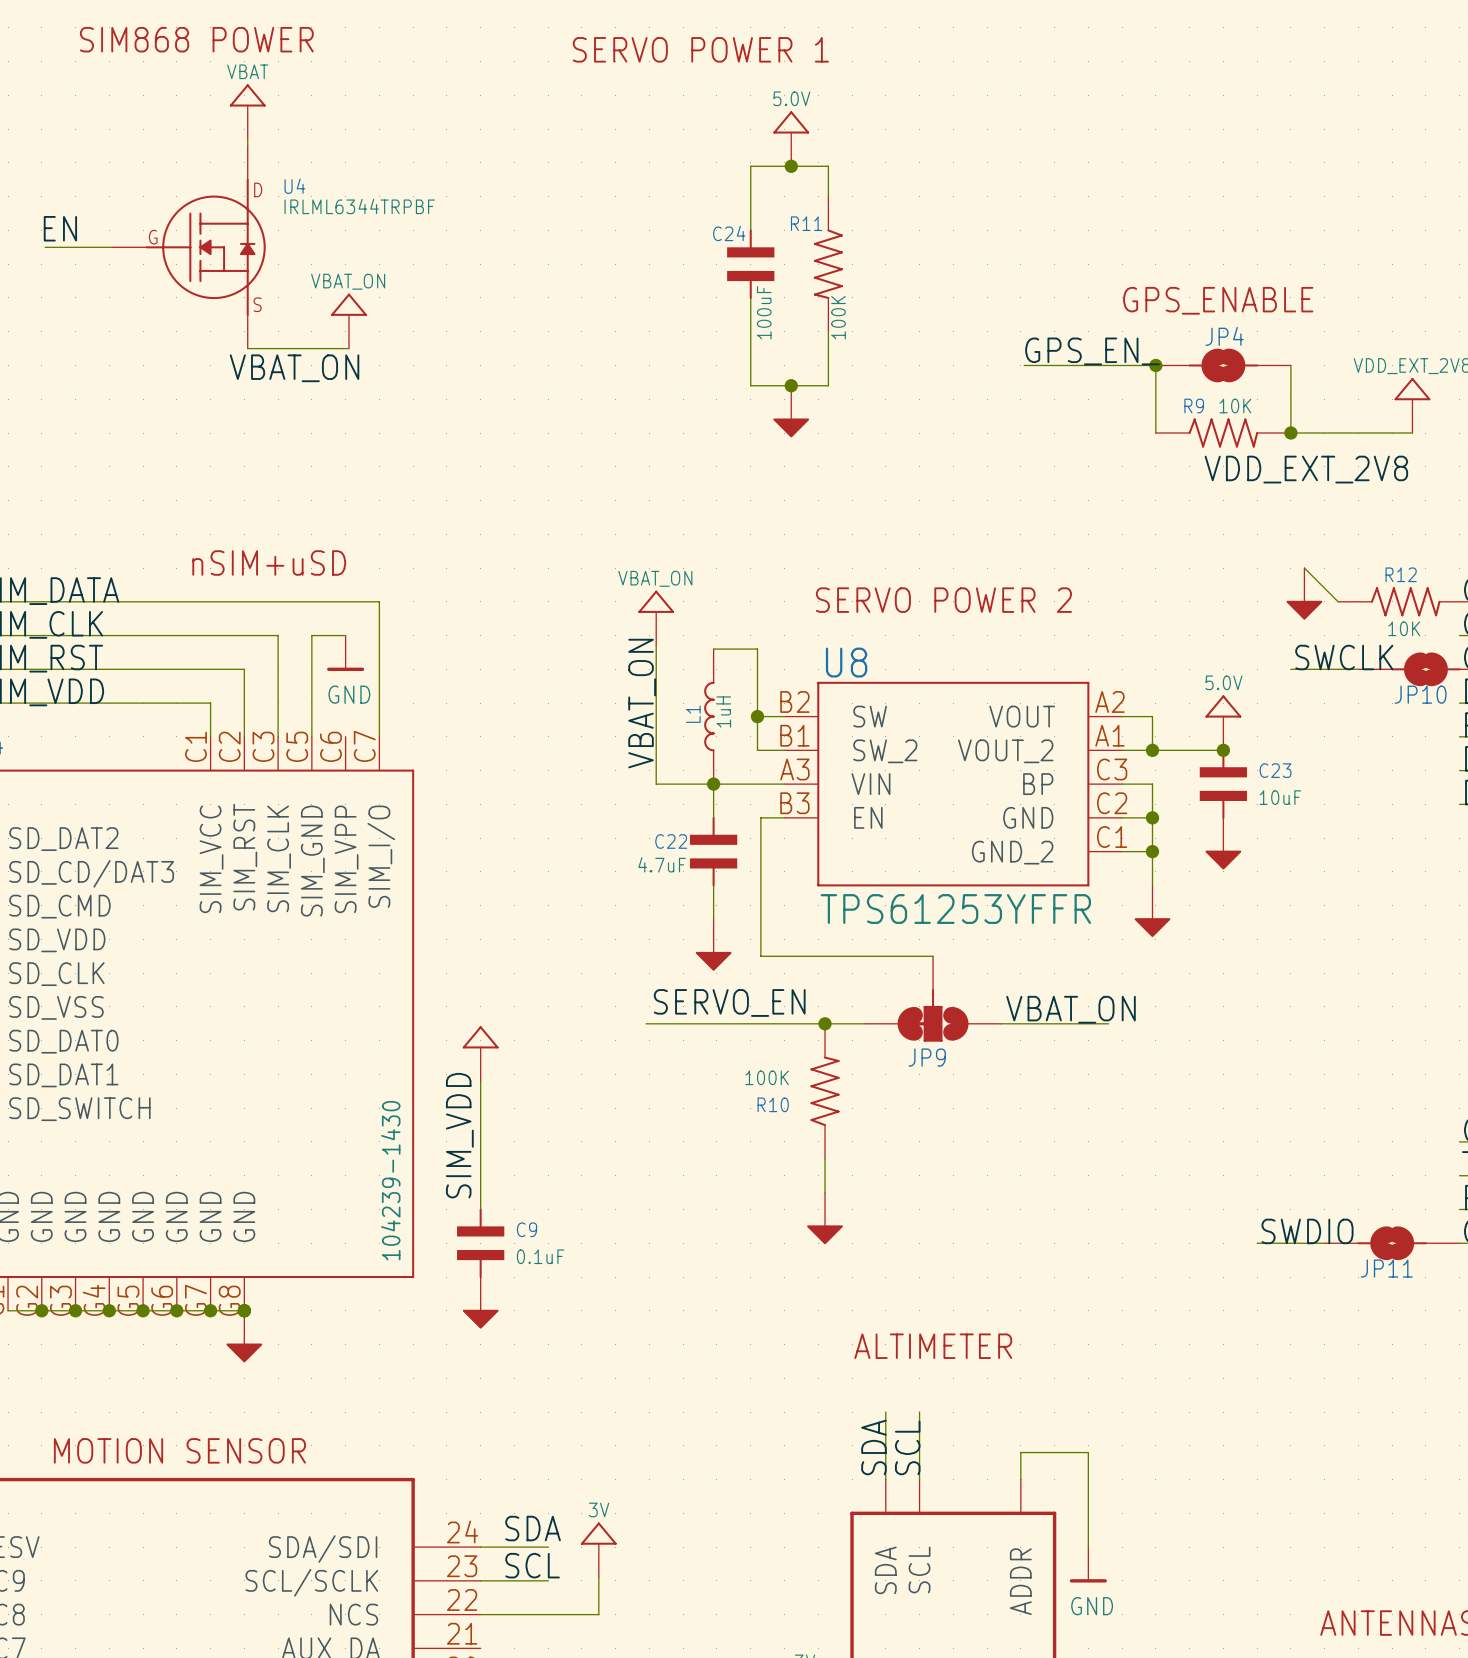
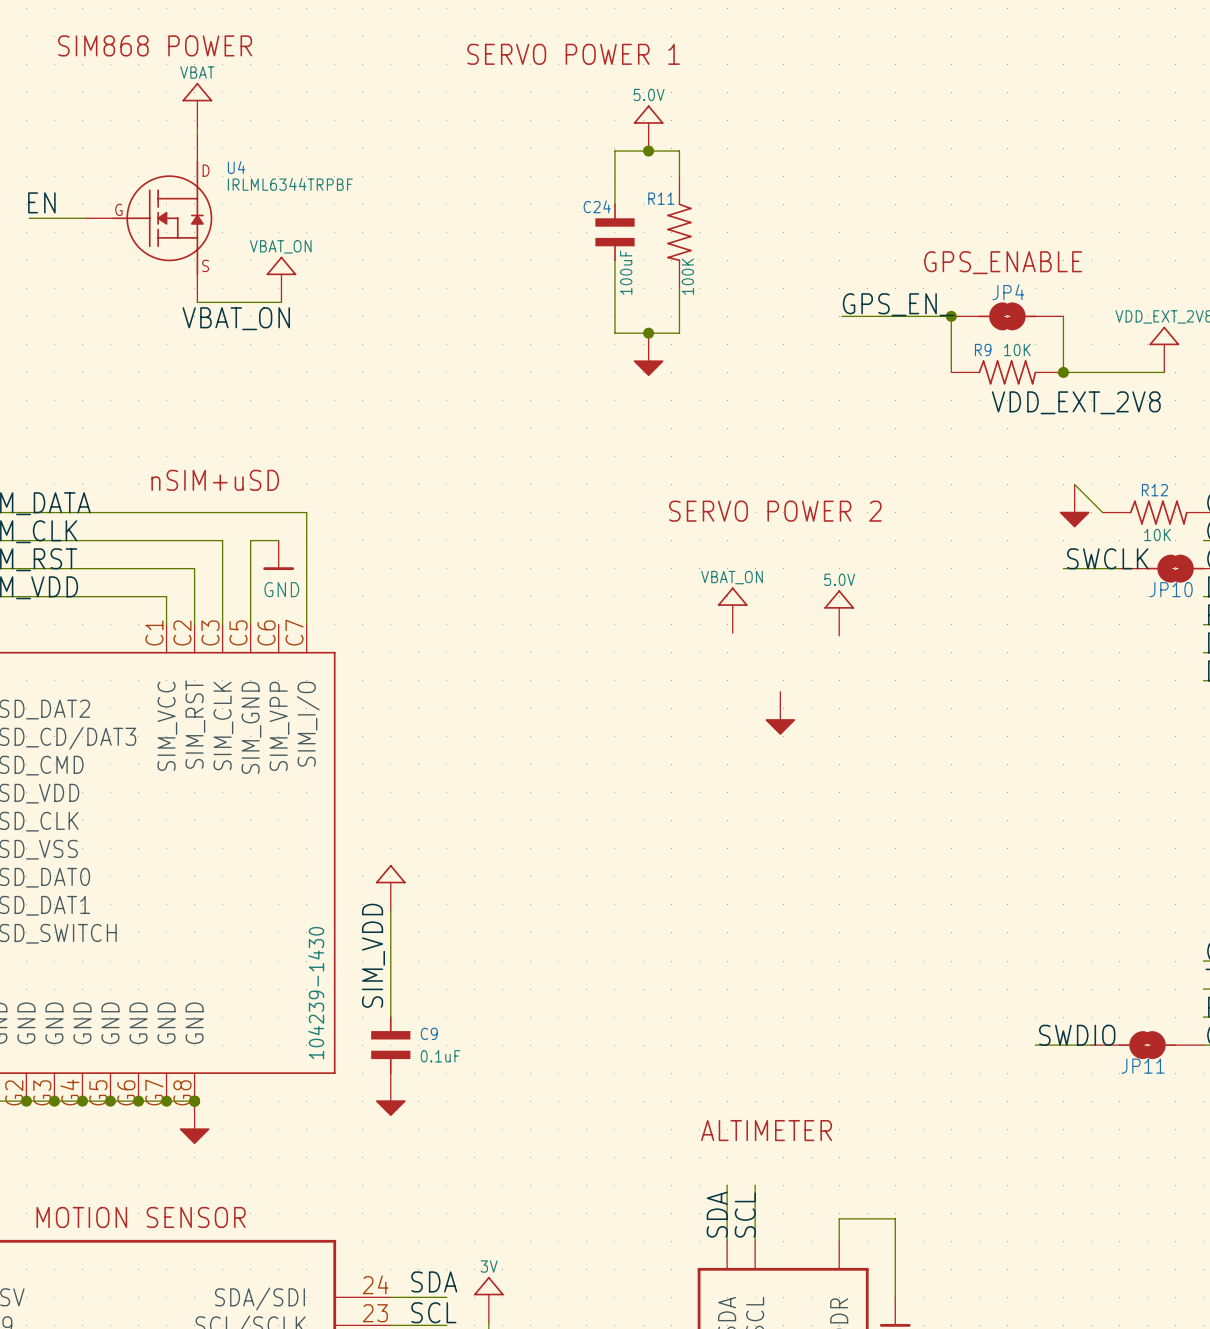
power symbol position: VBAT_ON (656, 618) -> VBAT_ON (732, 610)
wire: (656, 645) (656, 784) (784, 784) -> none
wire: (713, 649) (757, 649) (757, 750) (784, 750) -> none
label: VBAT_ON (642, 703) -> none
L1: 1uH (709, 716) -> none
wire: (757, 716) (784, 716) -> none
junction: (757, 716) -> none
wire: (1122, 716) (1152, 716) (1152, 750) -> none
power symbol position: 5.0V (1223, 722) -> 5.0V (839, 613)
wire: (1122, 750) (1223, 750) -> none
junction: (1152, 750) -> none
junction: (1223, 750) -> none
wire: (713, 784) (713, 817) -> none
junction: (713, 784) -> none
U8: TPS61253YFFR (953, 784) -> none
wire: (1122, 784) (1152, 784) (1152, 885) -> none
C23: 10uF (1223, 784) -> none
wire: (784, 817) (760, 817) (760, 956) (933, 956) -> none
wire: (1122, 817) (1152, 817) -> none
junction: (1152, 817) -> none
power symbol: none -> (780, 713)
power symbol: (1223, 843) -> none
C22: 4.7uF (713, 851) -> none
wire: (1122, 851) (1152, 851) -> none
junction: (1152, 851) -> none
wire: (713, 885) (713, 919) -> none
power symbol: (1152, 911) -> none
power symbol: (713, 944) -> none
JP9: (933, 998) -> none
label: SERVO_EN (729, 1002) -> none
label: VBAT_ON (1071, 1009) -> none
wire: (646, 1023) (865, 1023) -> none
junction: (825, 1023) -> none
wire: (1000, 1023) (1108, 1023) -> none
R10: 100K (825, 1091) -> none
wire: (825, 1158) (825, 1192) -> none
power symbol: (825, 1218) -> none

